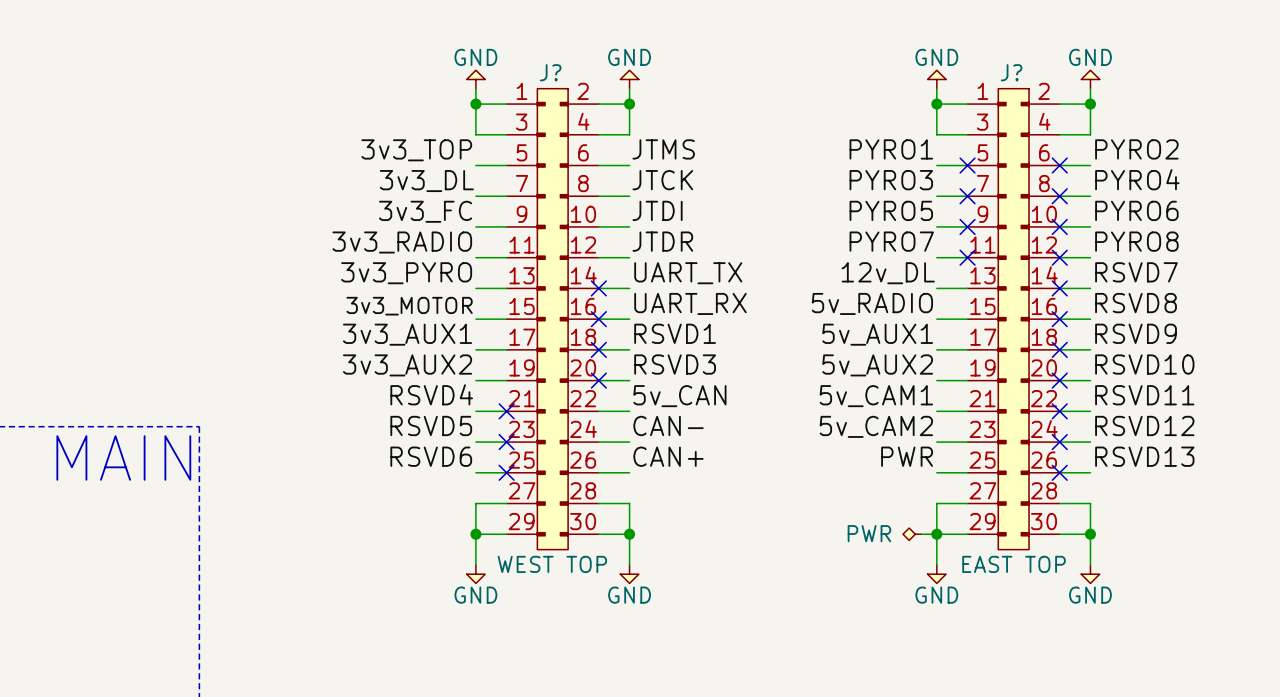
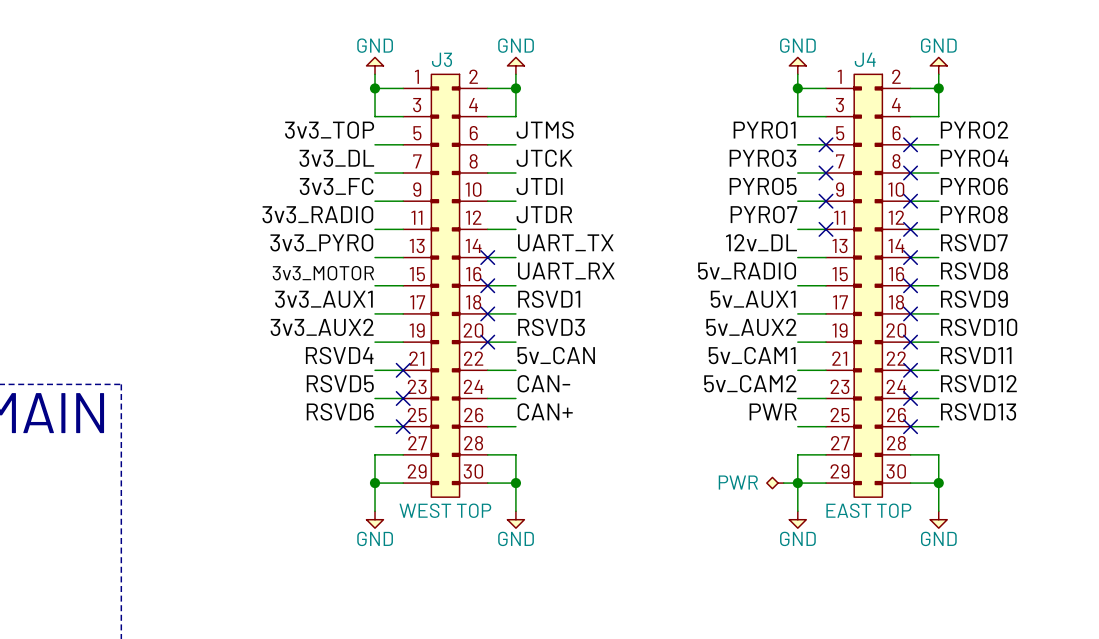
J? name: J? (550, 72) -> J3 (442, 59)
J? name: J? (1011, 72) -> J4 (865, 59)

